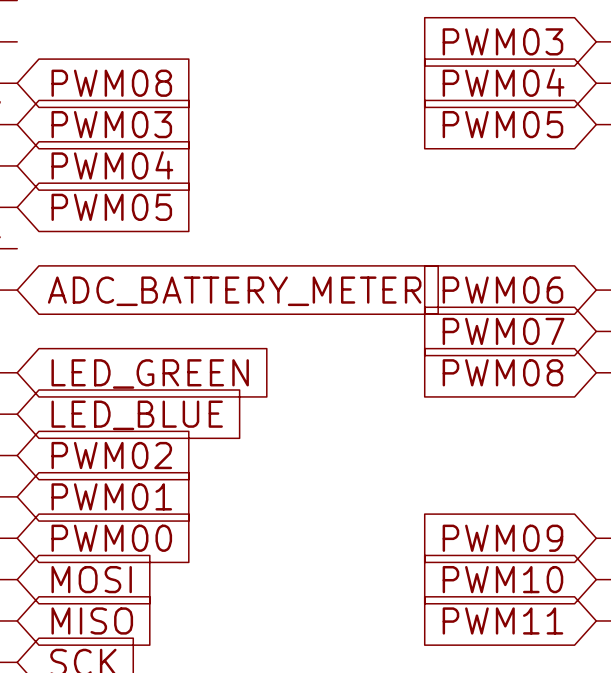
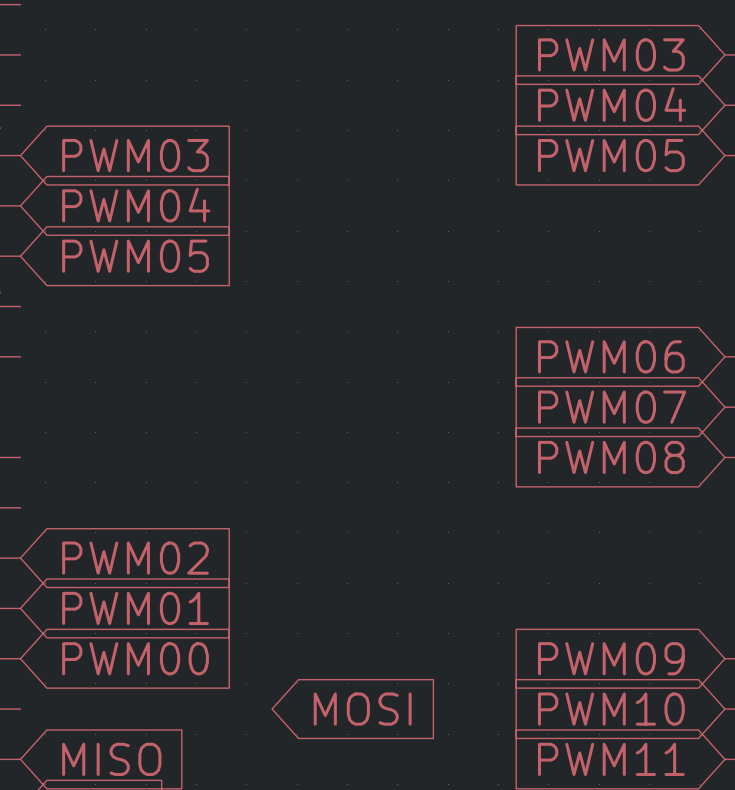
global label: PWM08 (111, 83) -> none
global label: ADC_BATTERY_METER (234, 291) -> none
global label: LED_GREEN (150, 373) -> none
global label: LED_BLUE (137, 415) -> none
global label position: MOSI (91, 579) -> MOSI (362, 709)

